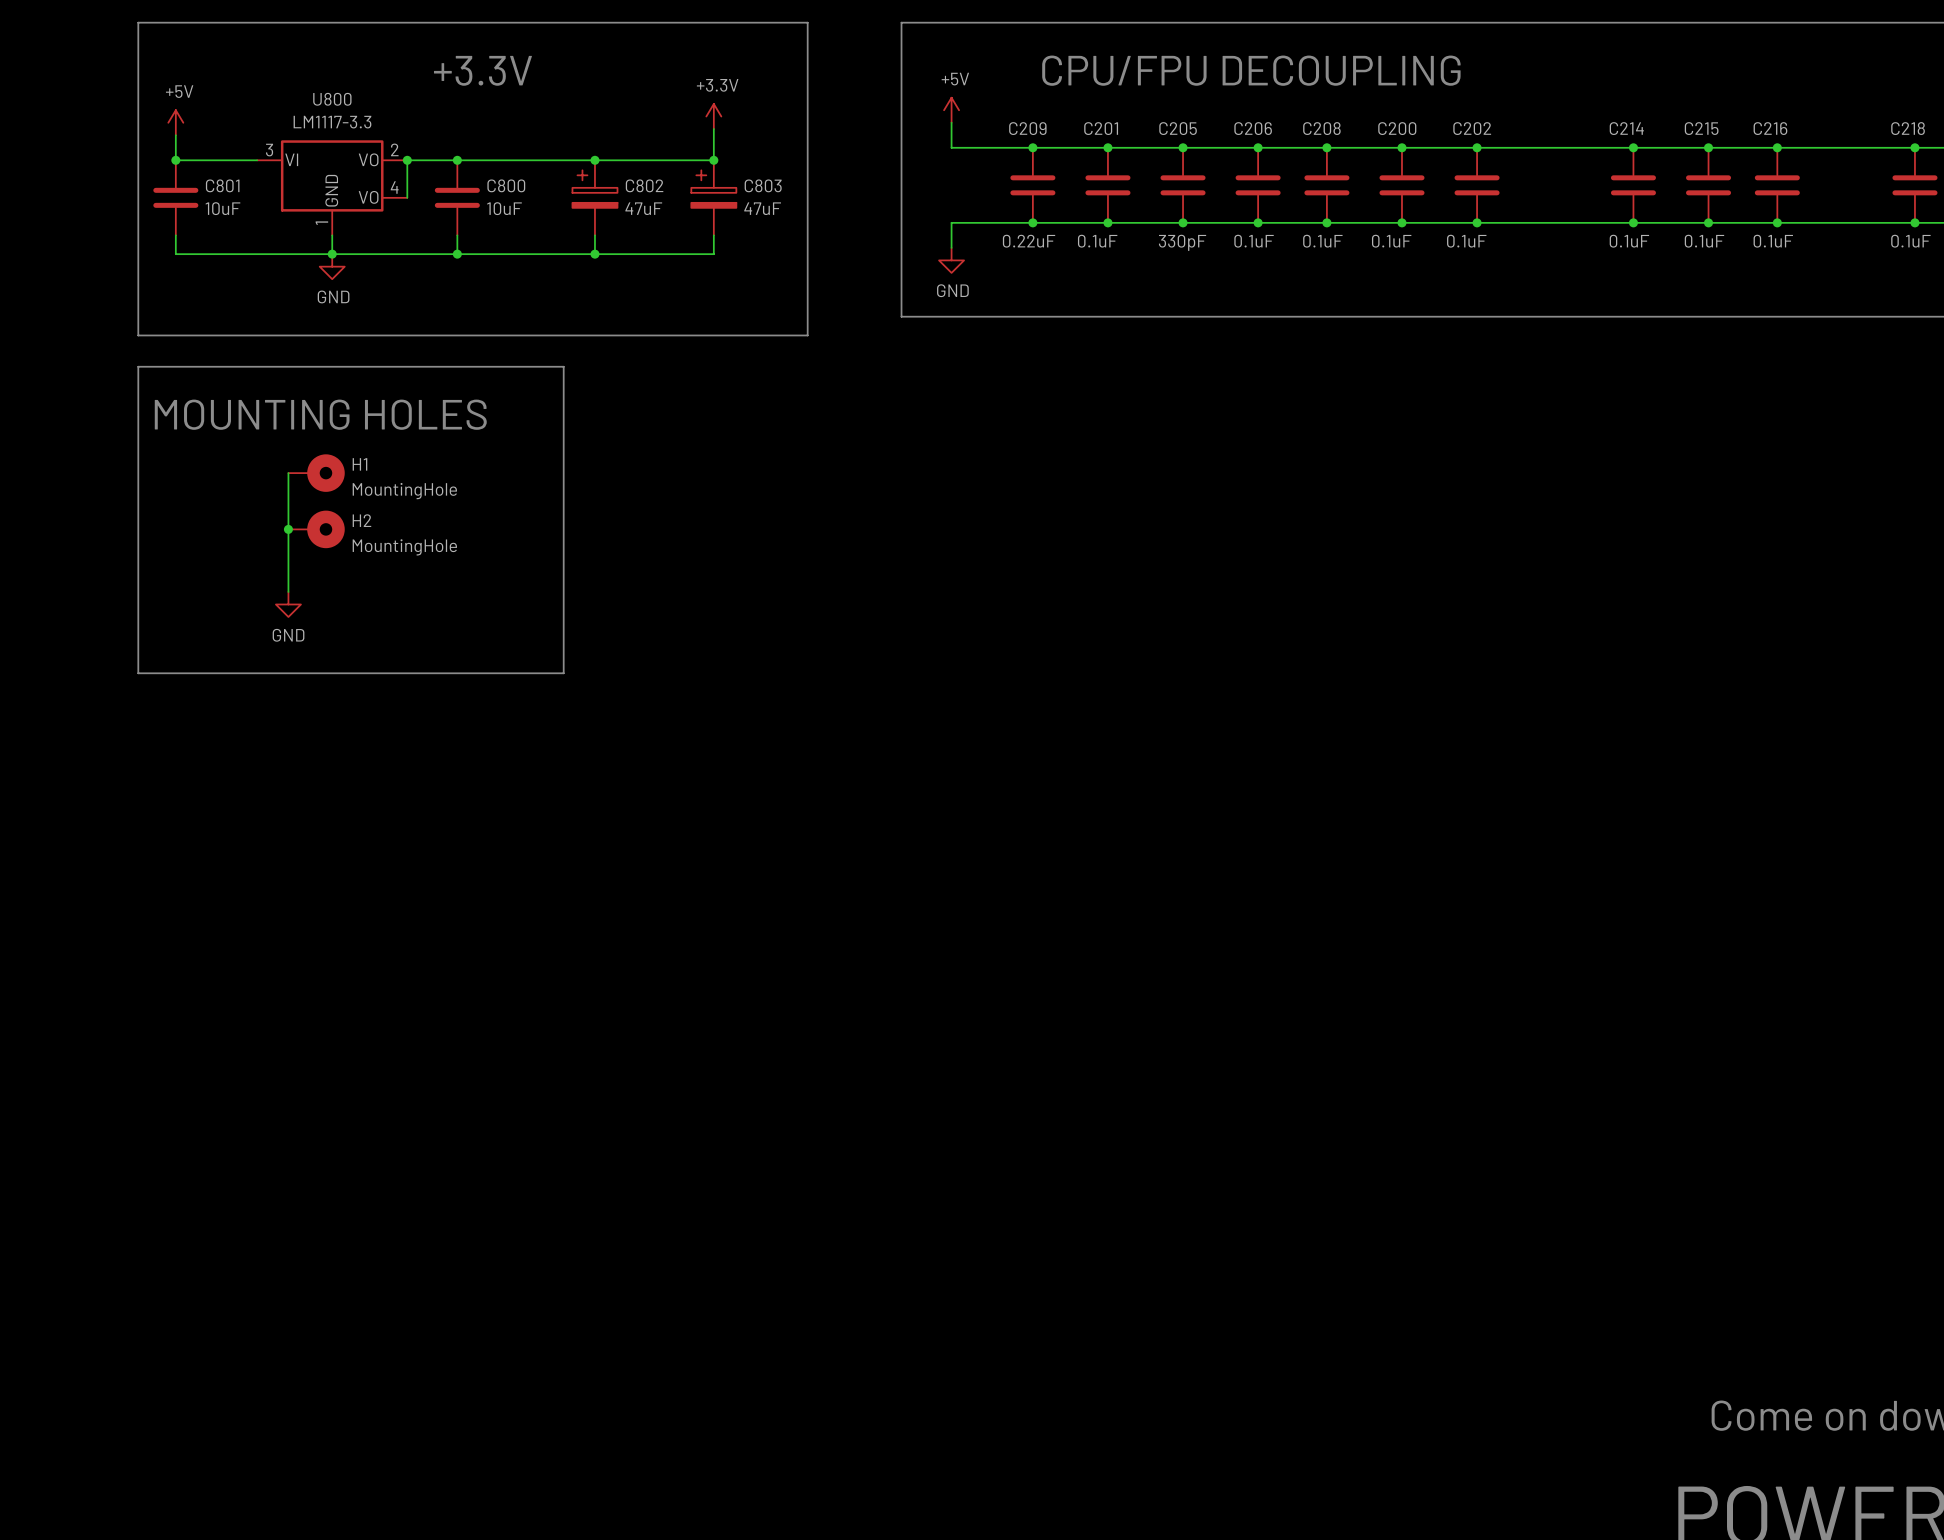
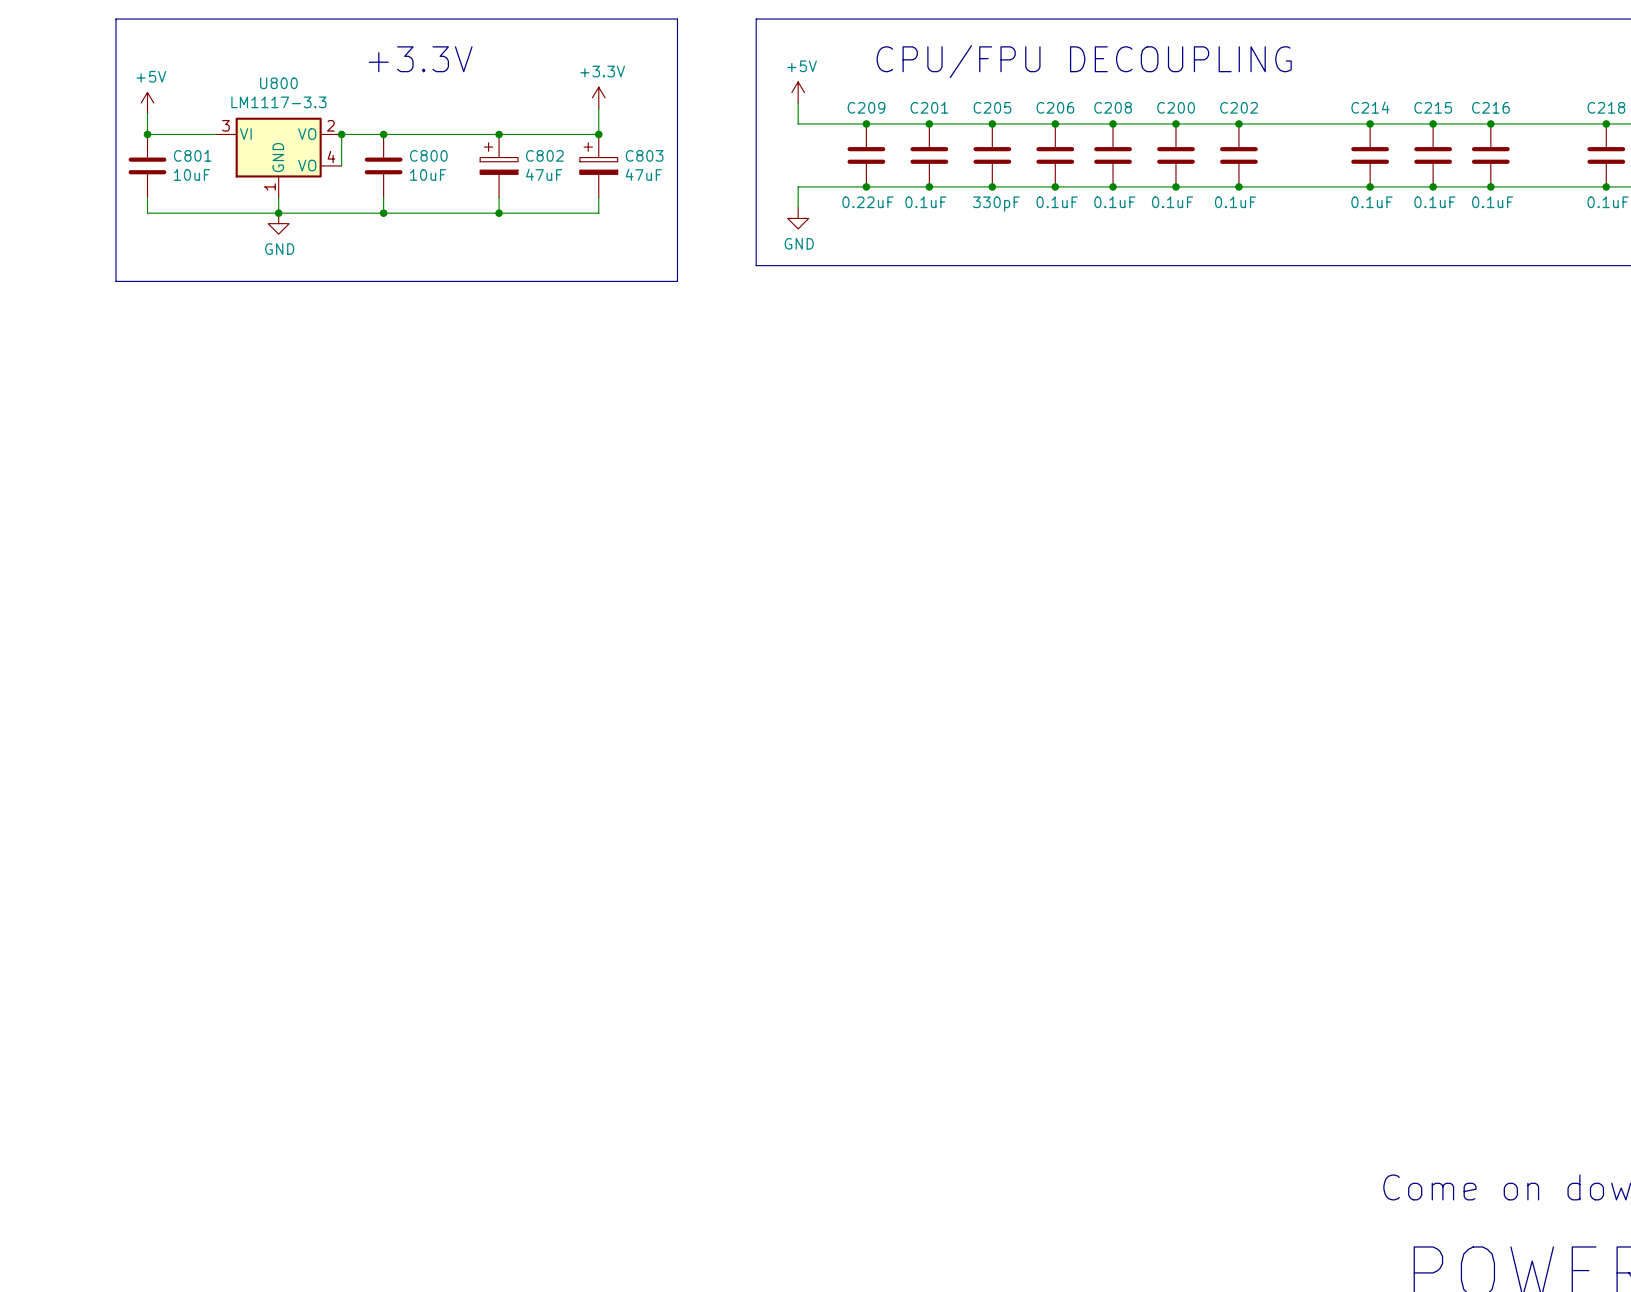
line: (138, 366) (138, 673) (563, 673) (563, 366) (138, 366) -> none
text: MOUNTING HOLES (320, 414) -> none
wire: (288, 473) (288, 591) -> none
H1: MountingHole (316, 473) -> none
junction: (288, 529) -> none
H2: MountingHole (316, 529) -> none
power symbol: GND (288, 604) -> none

